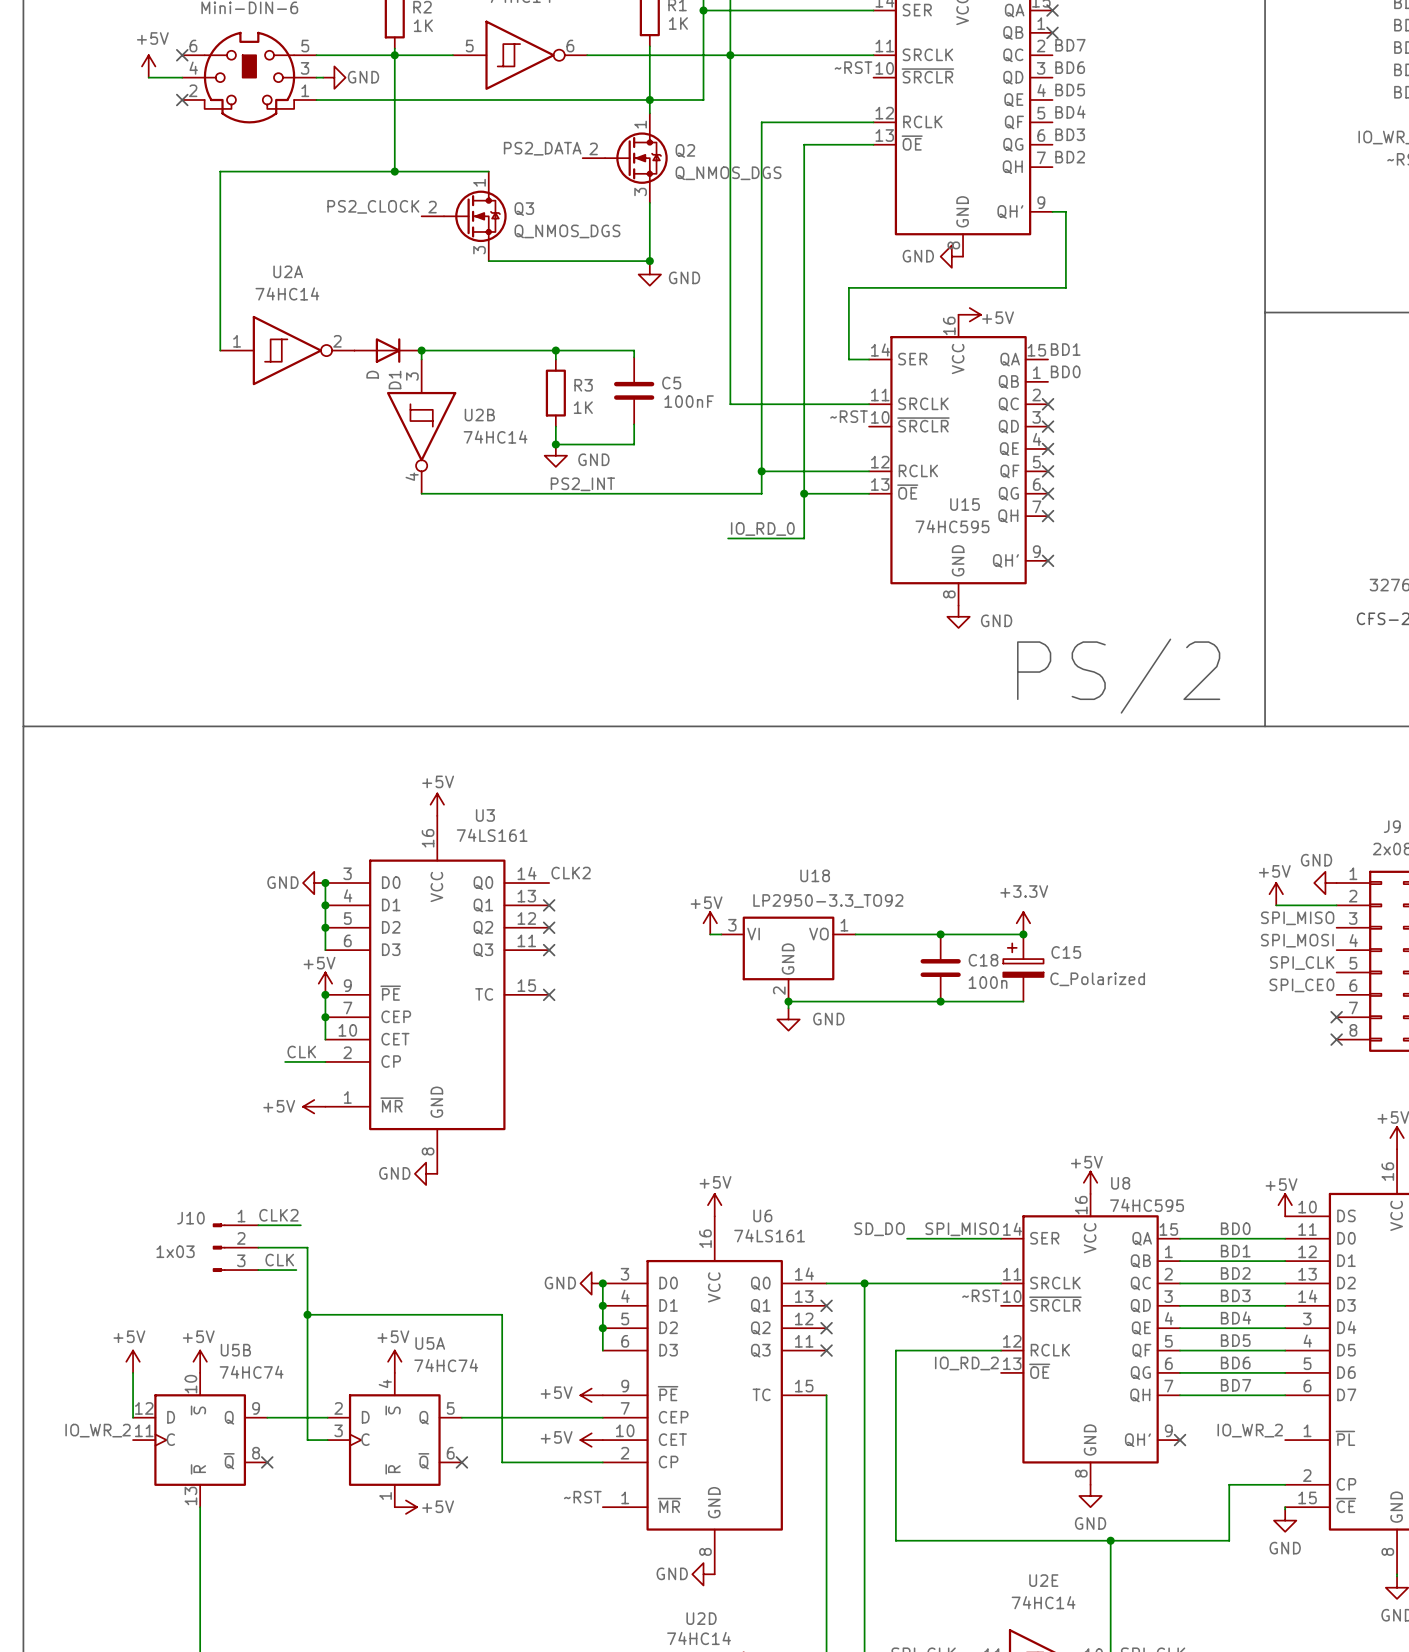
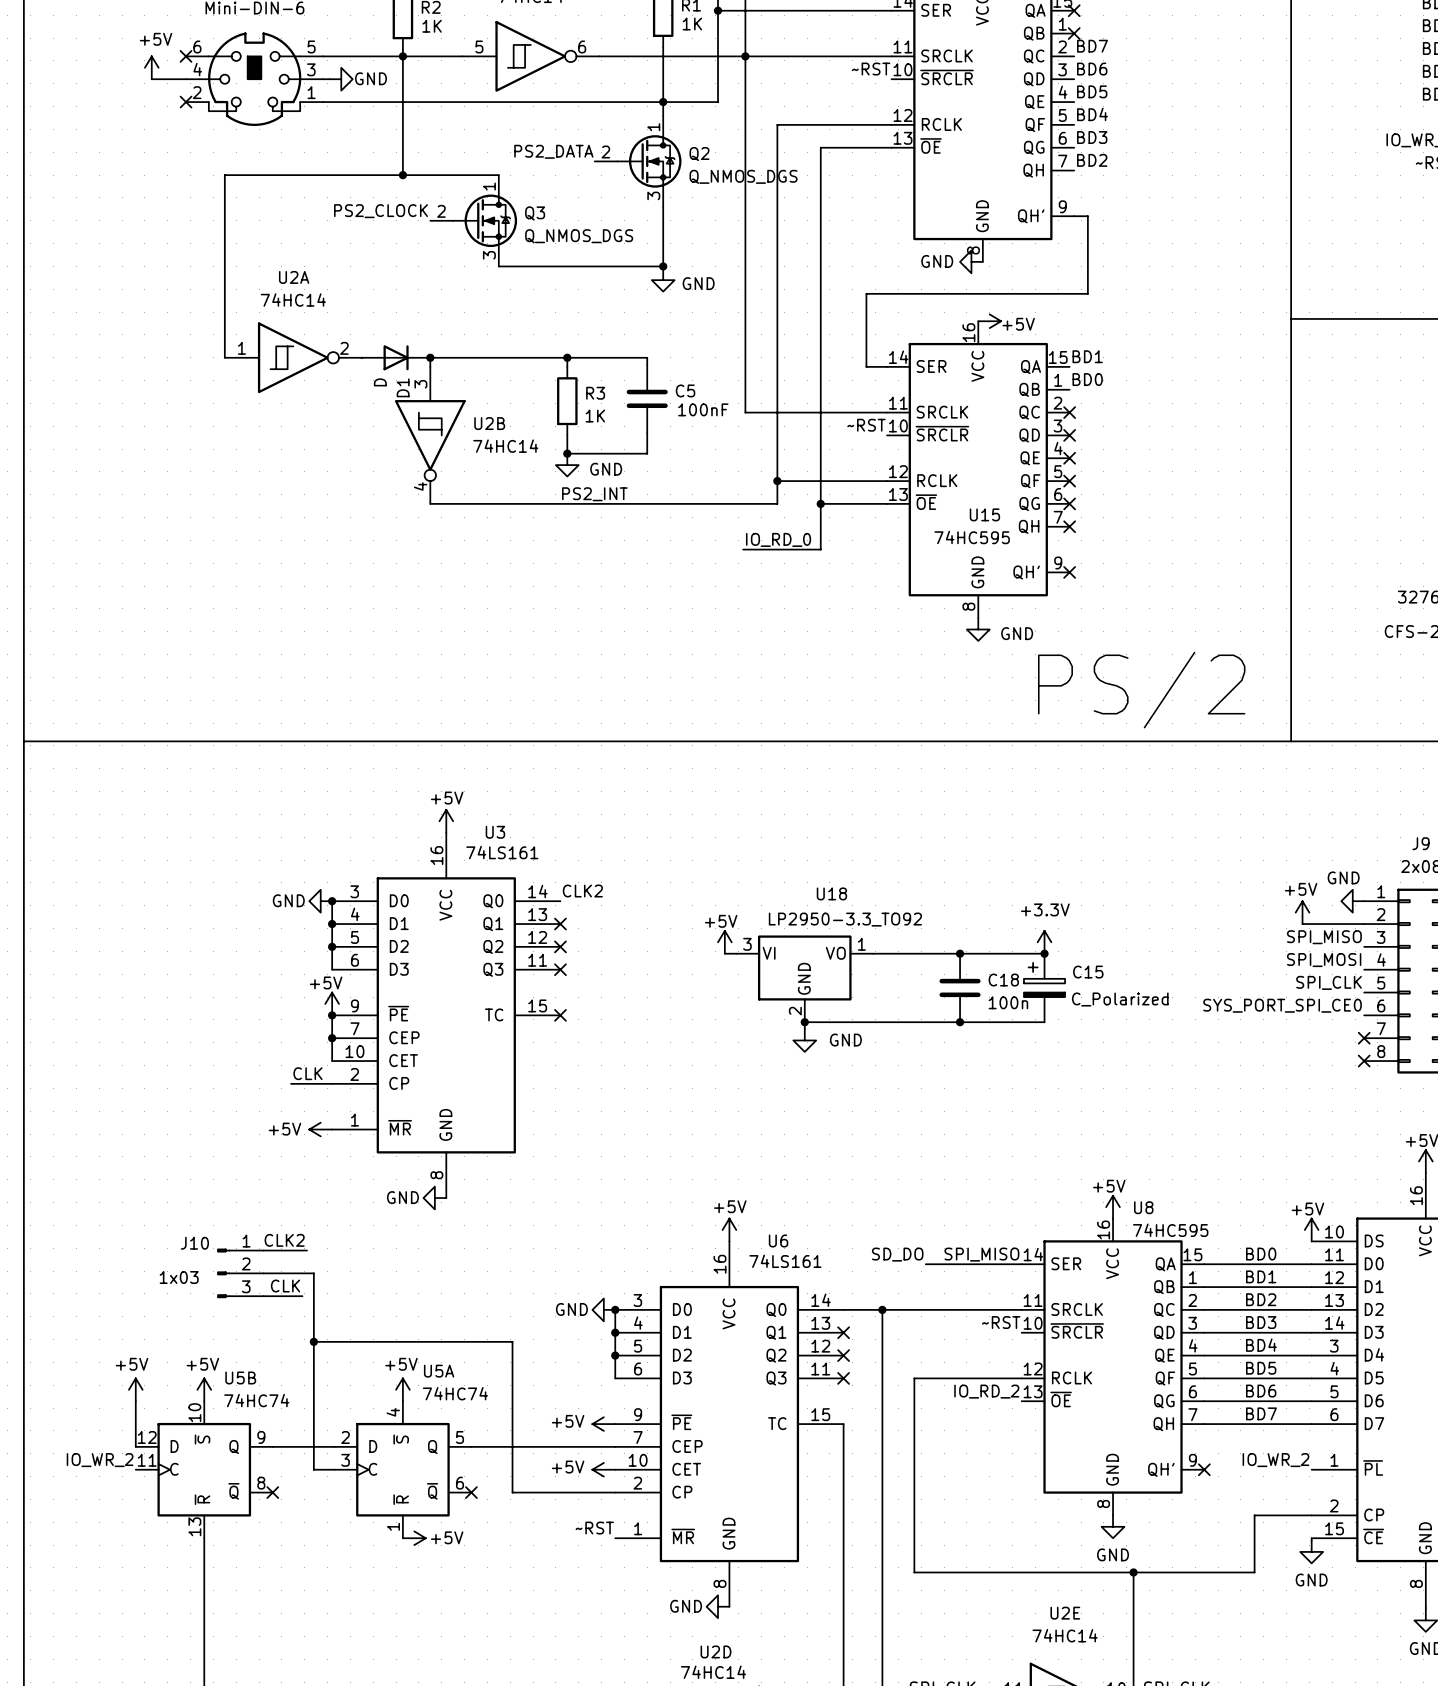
label: SPI_CE0 (1301, 985) -> SYS_PORT_SPI_CE0 (1282, 1005)

